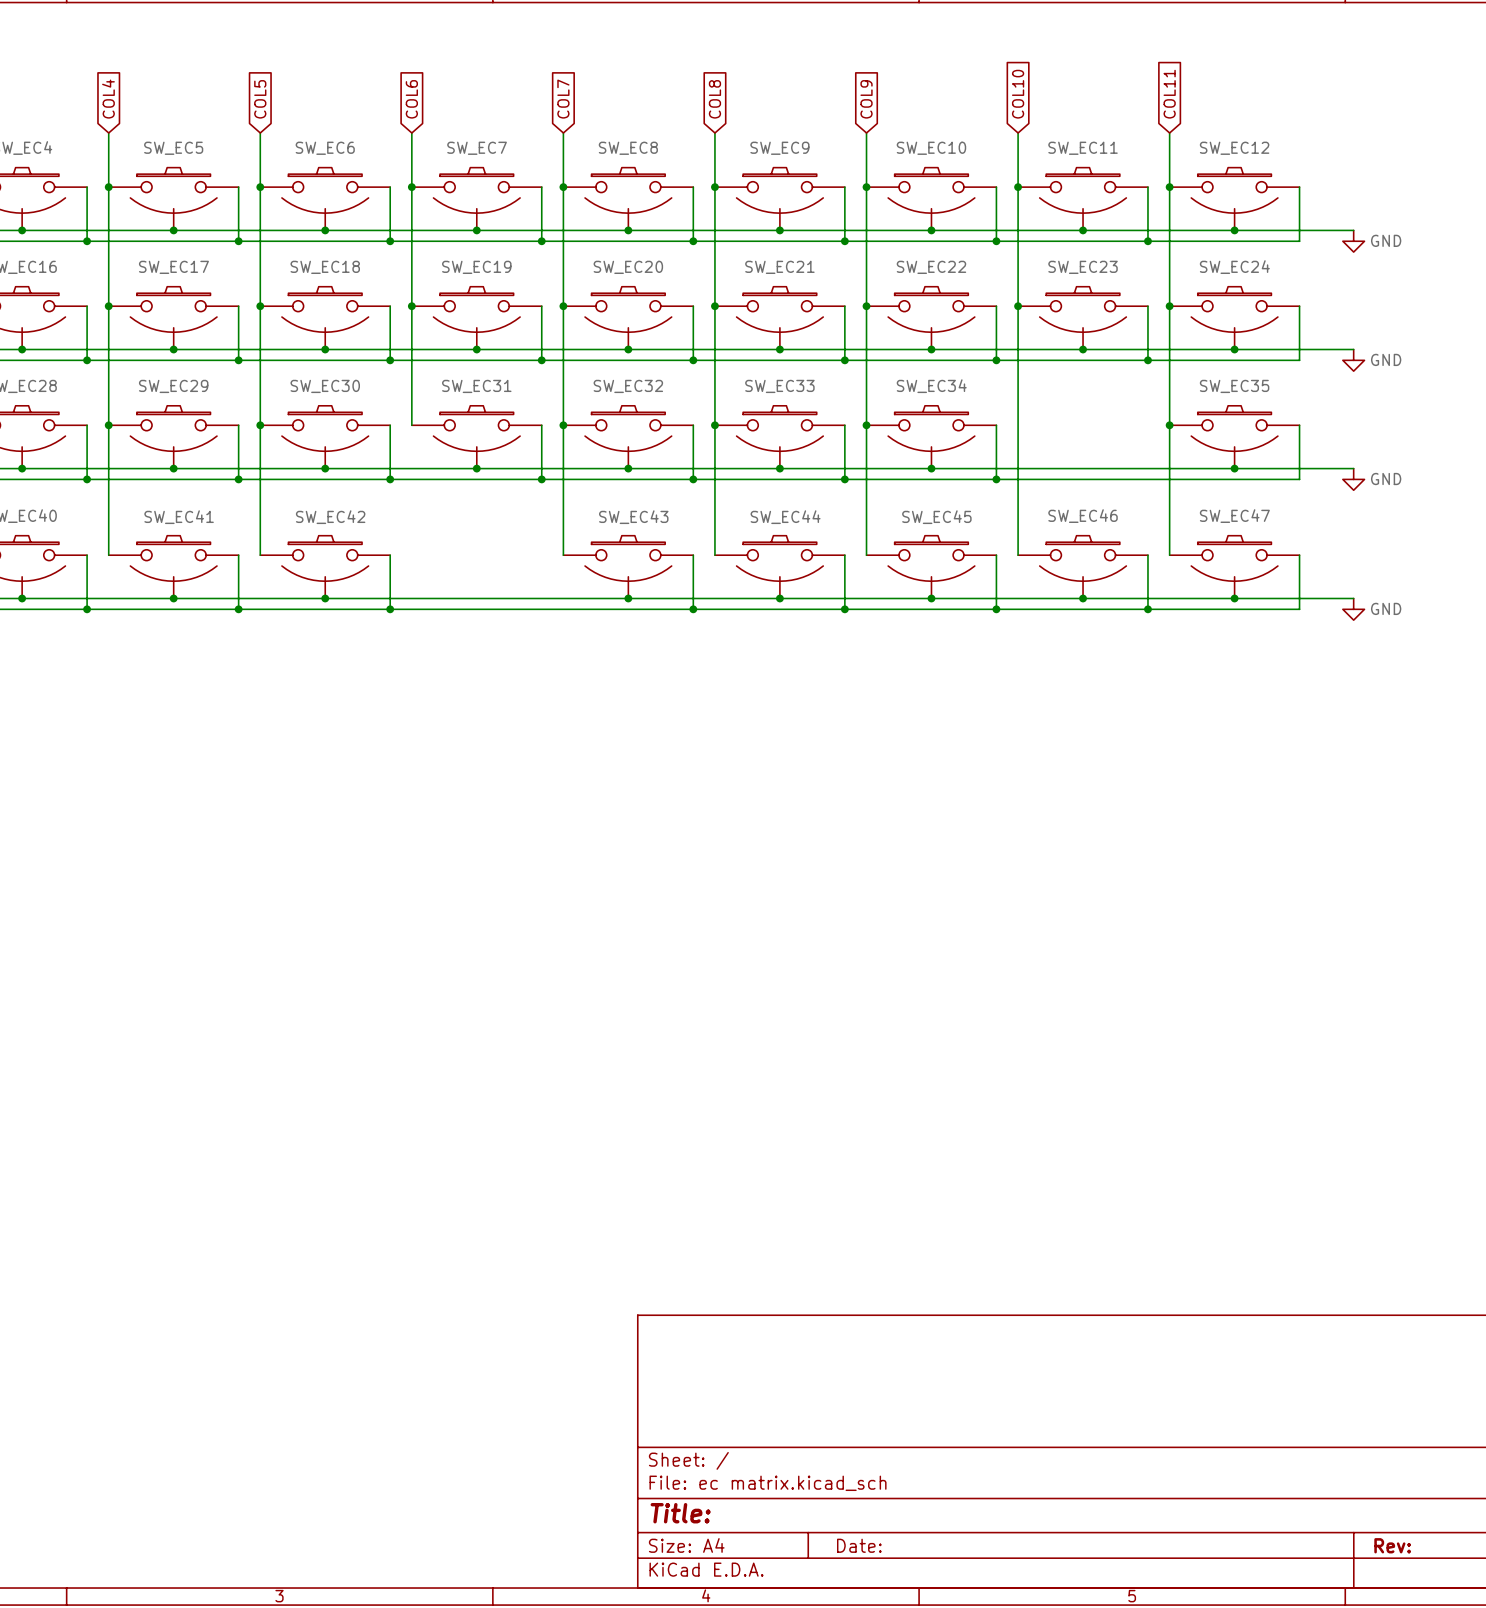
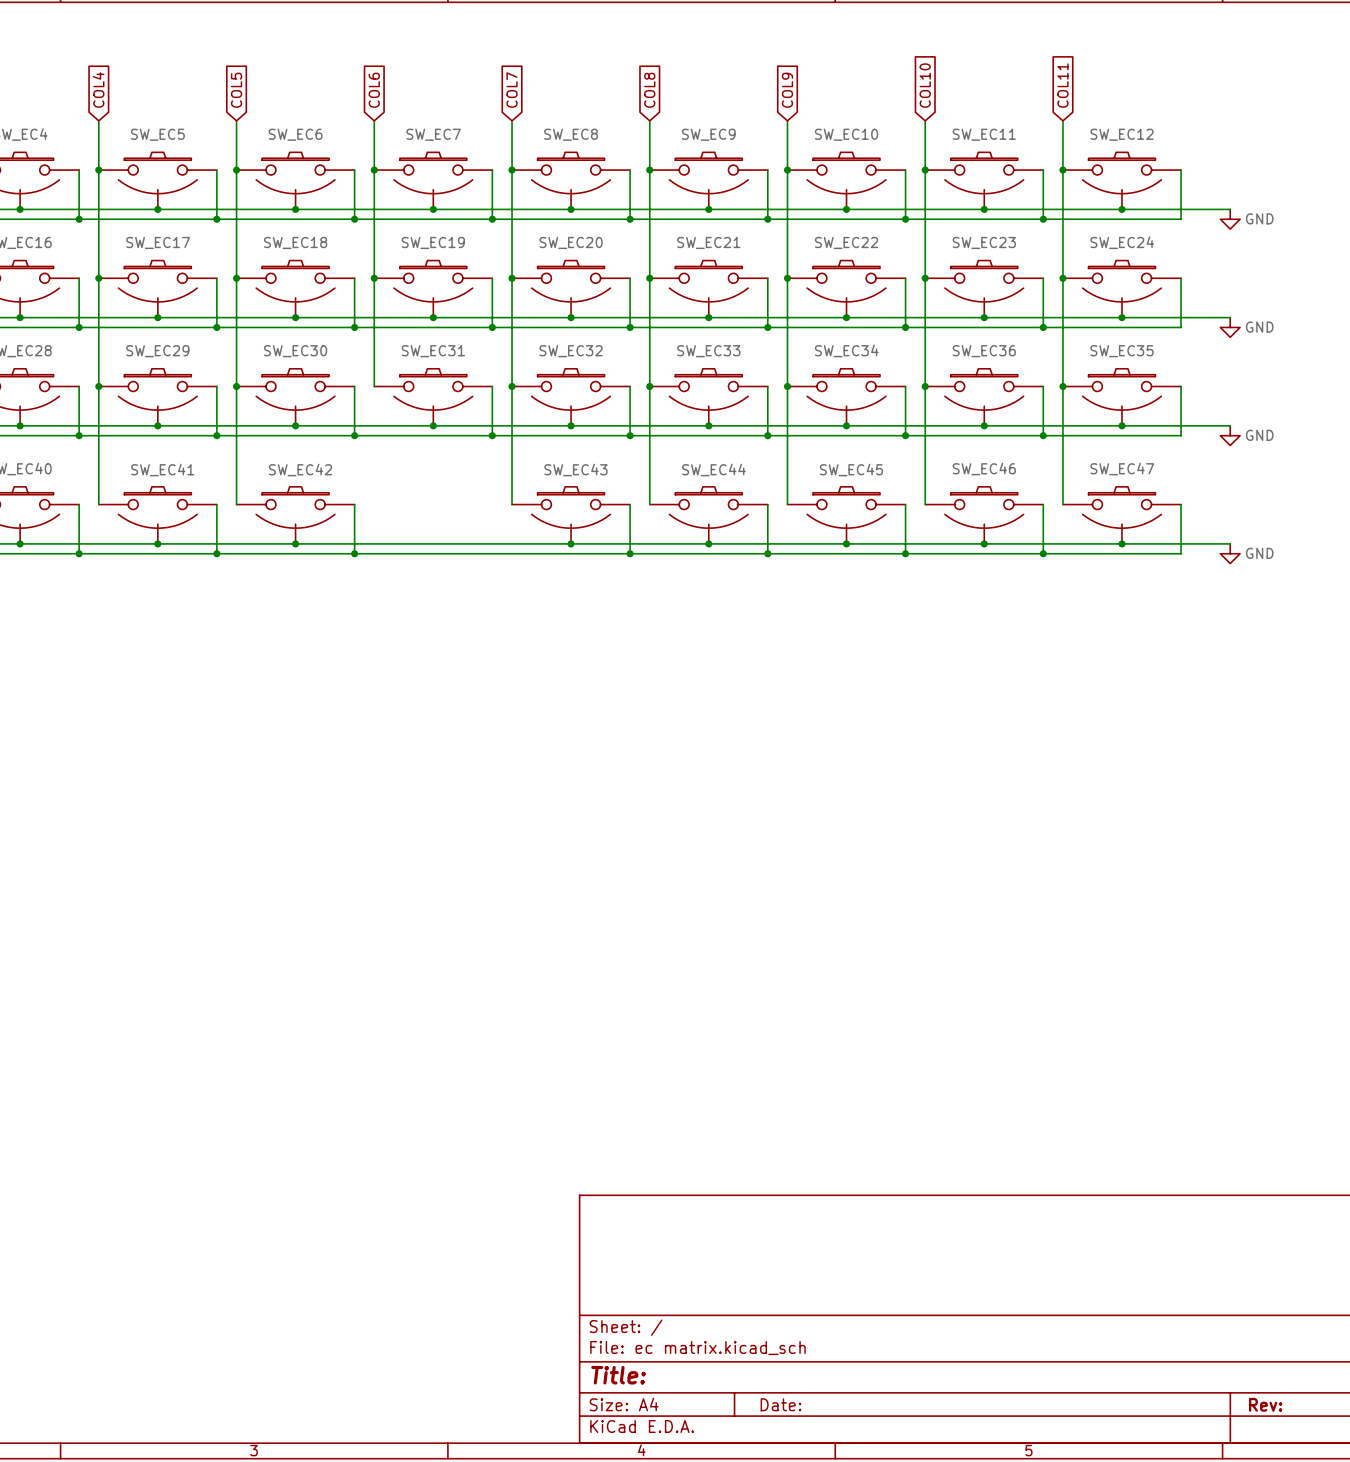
junction: none -> (925, 386)
wire: none -> (1043, 386) (1043, 435)
SW_EC36: none -> (984, 397)
junction: none -> (984, 425)
junction: none -> (1043, 435)

